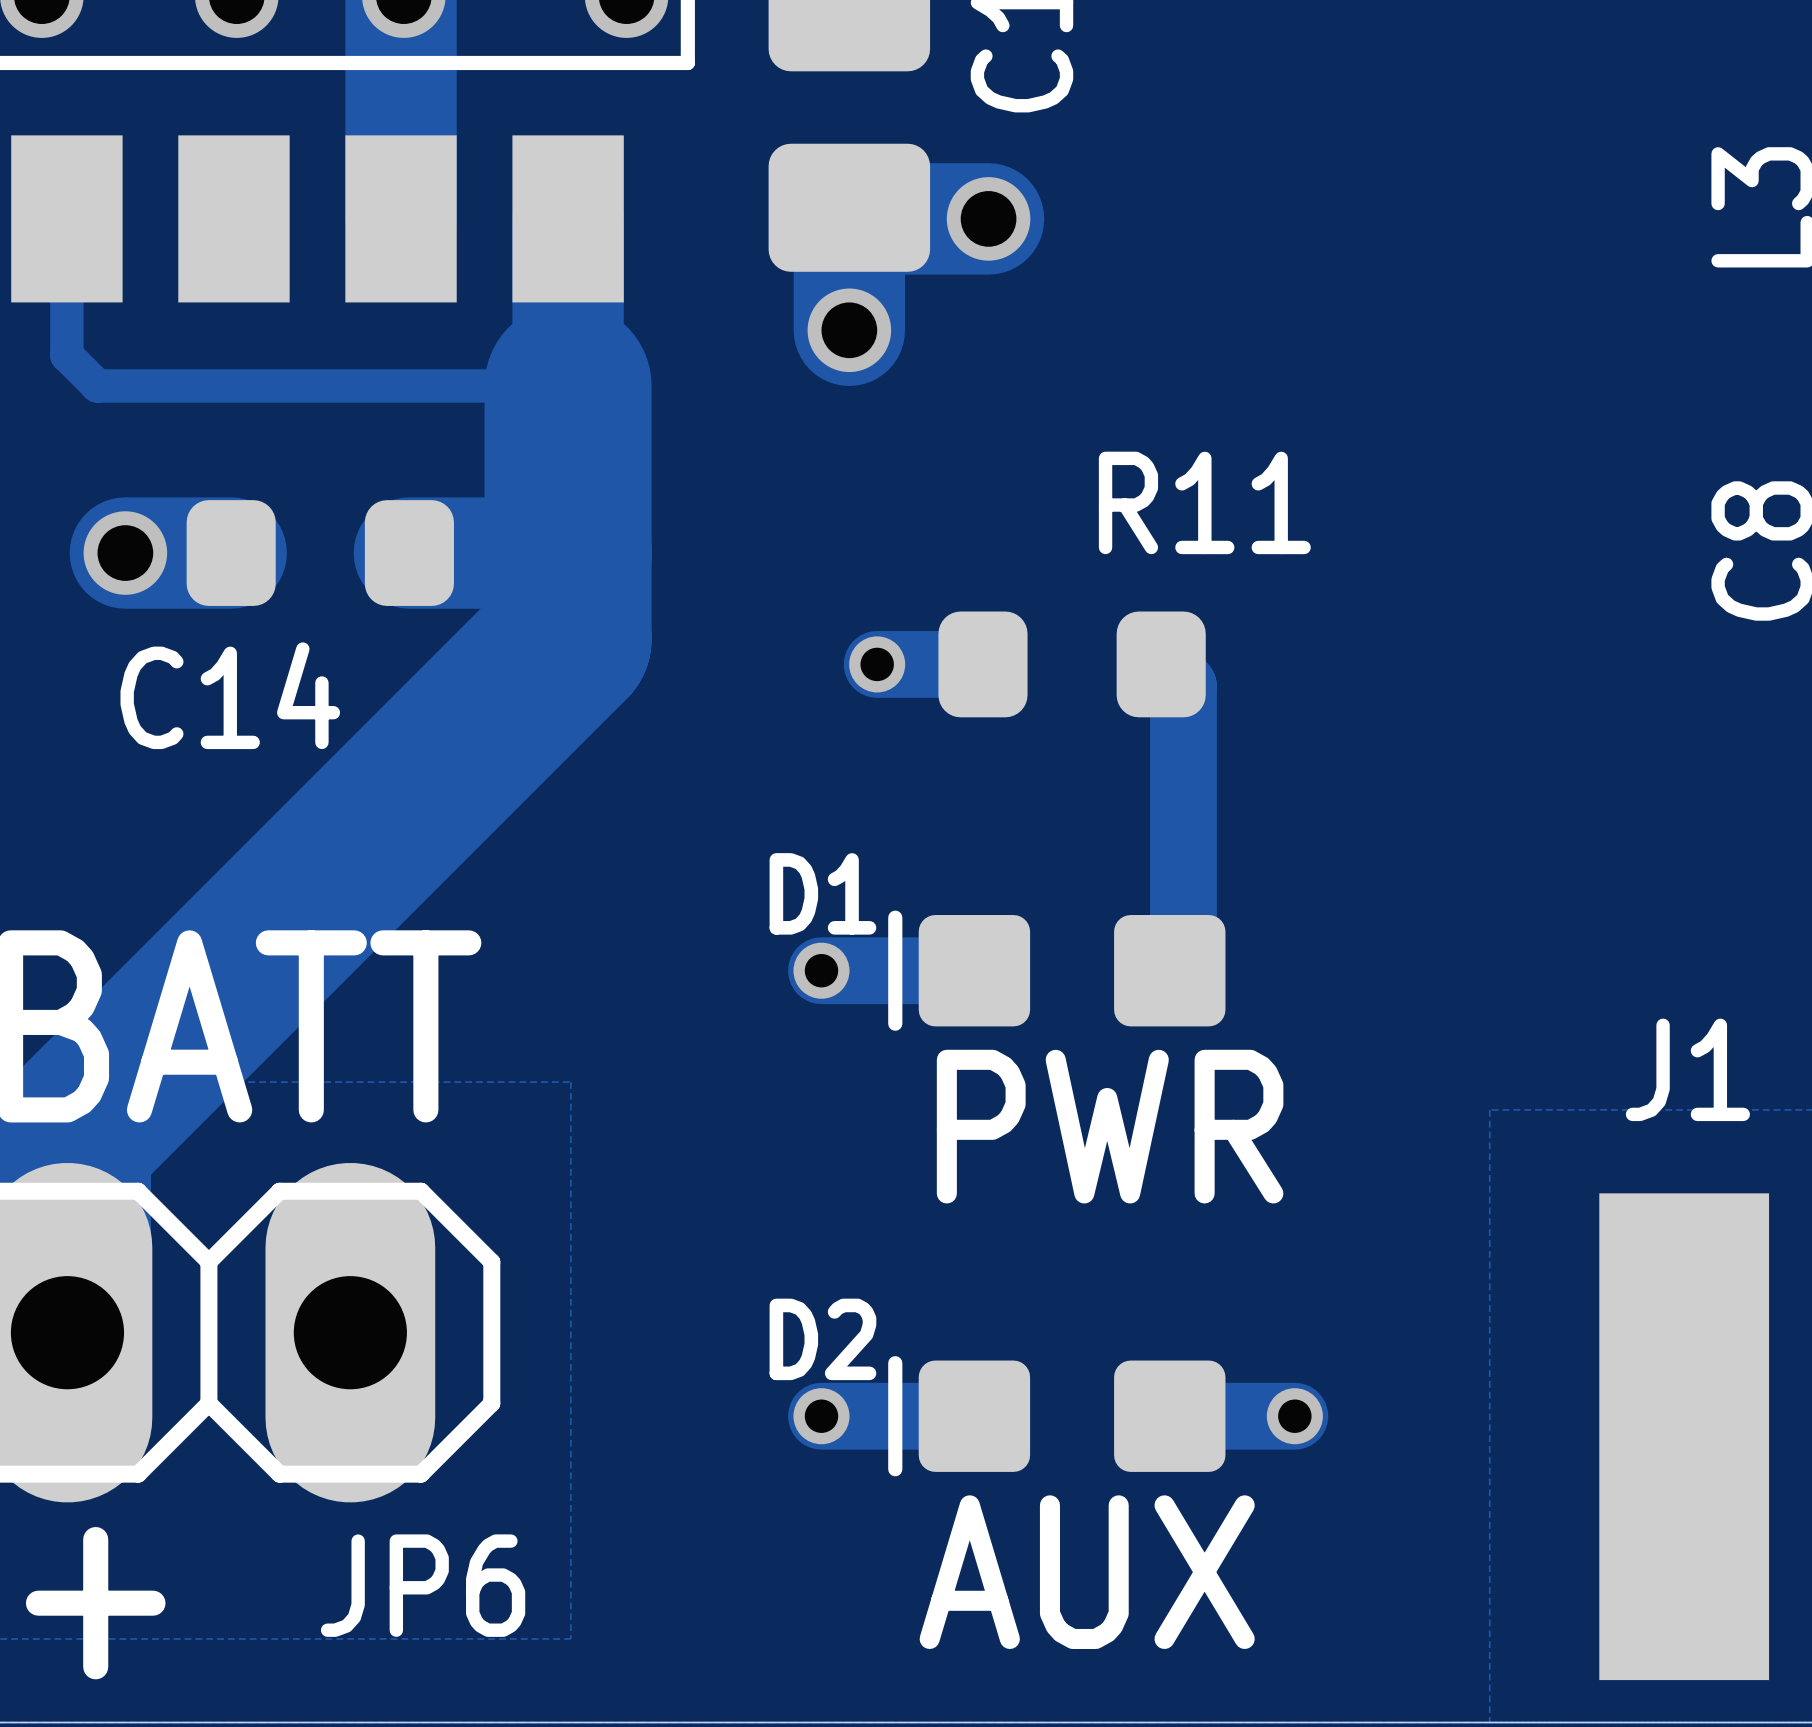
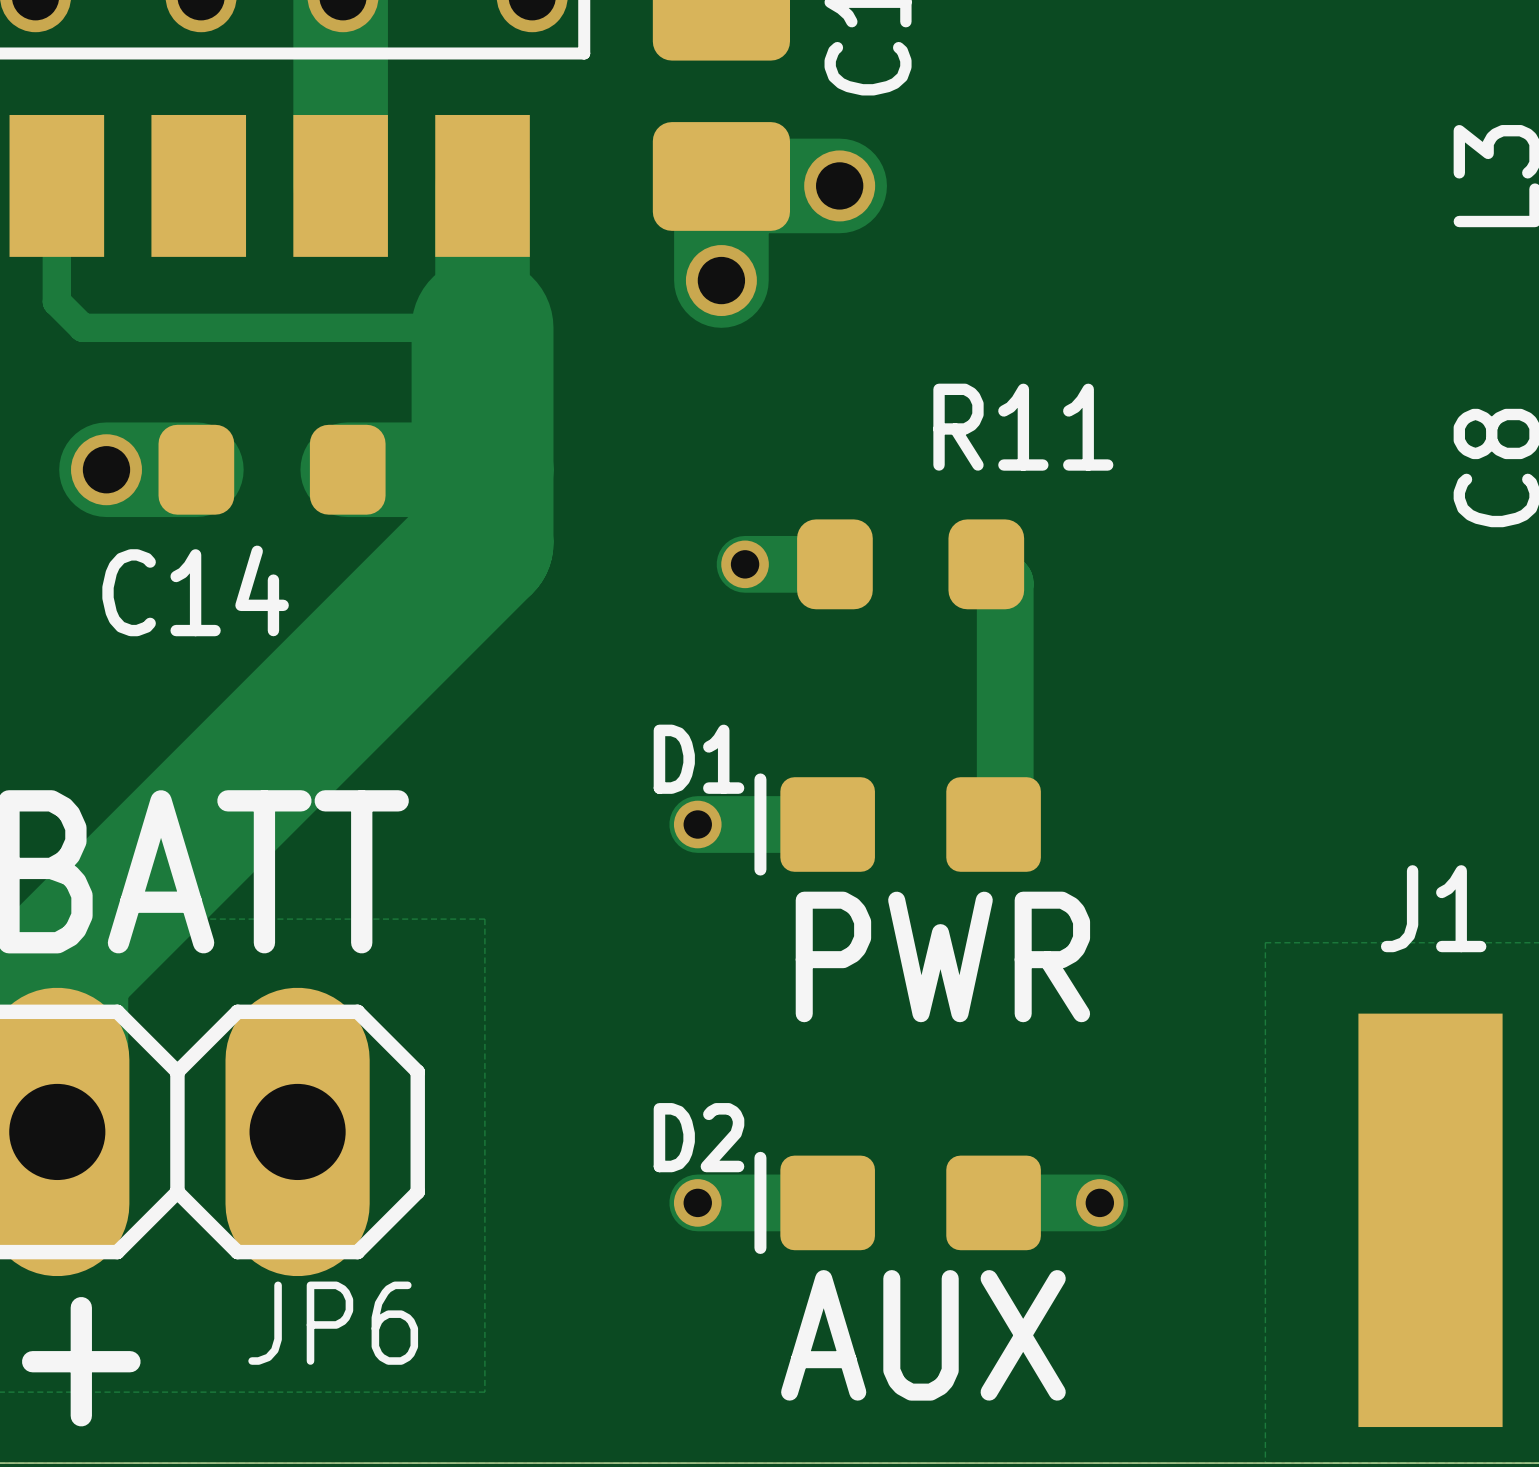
JP6 name position: JP6 (423, 1585) -> JP6 (333, 1323)

